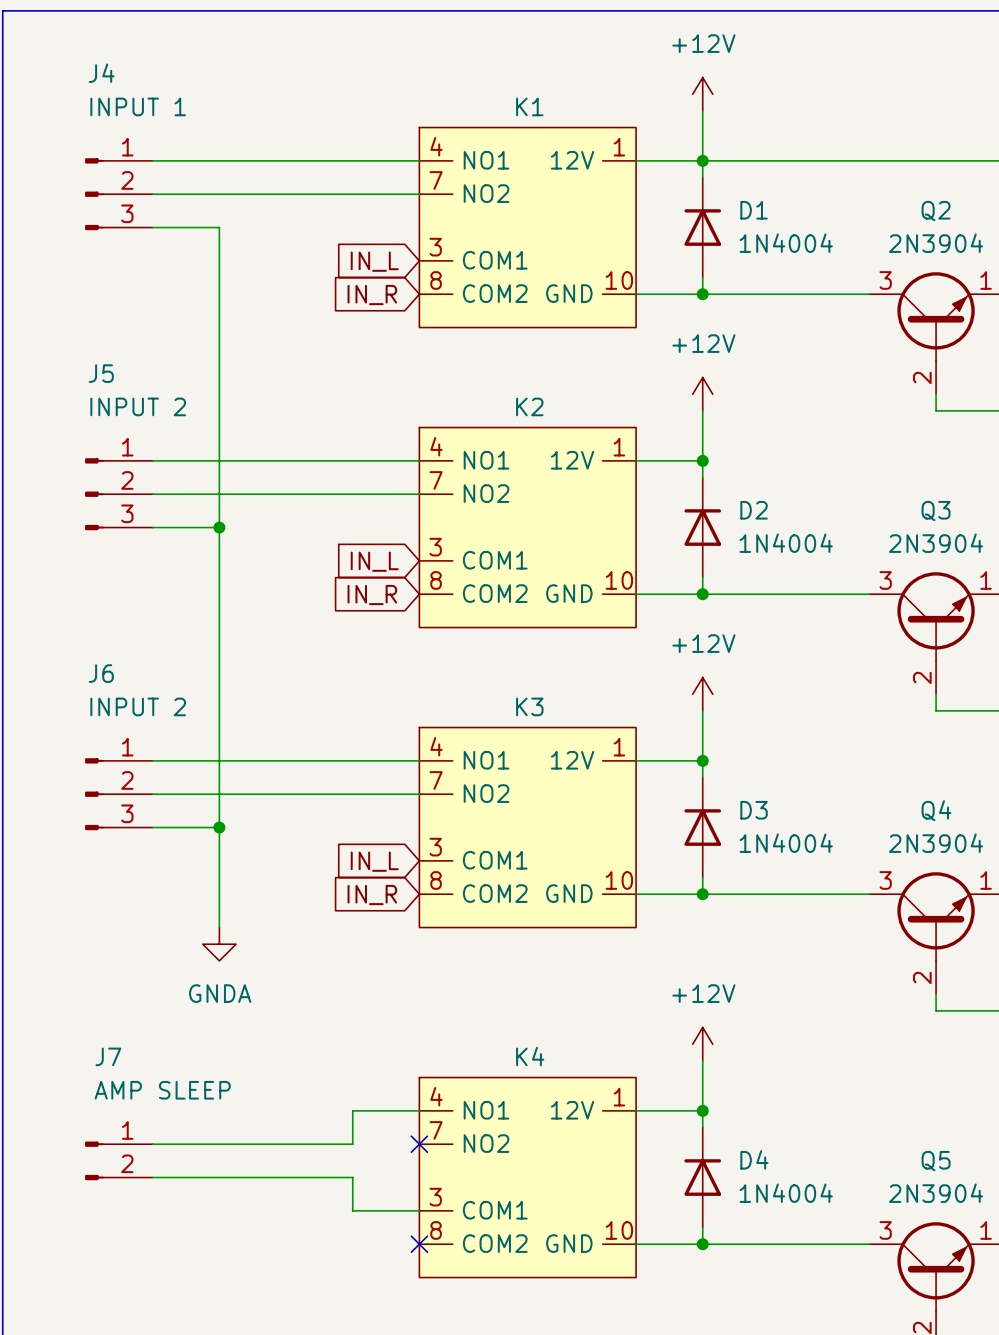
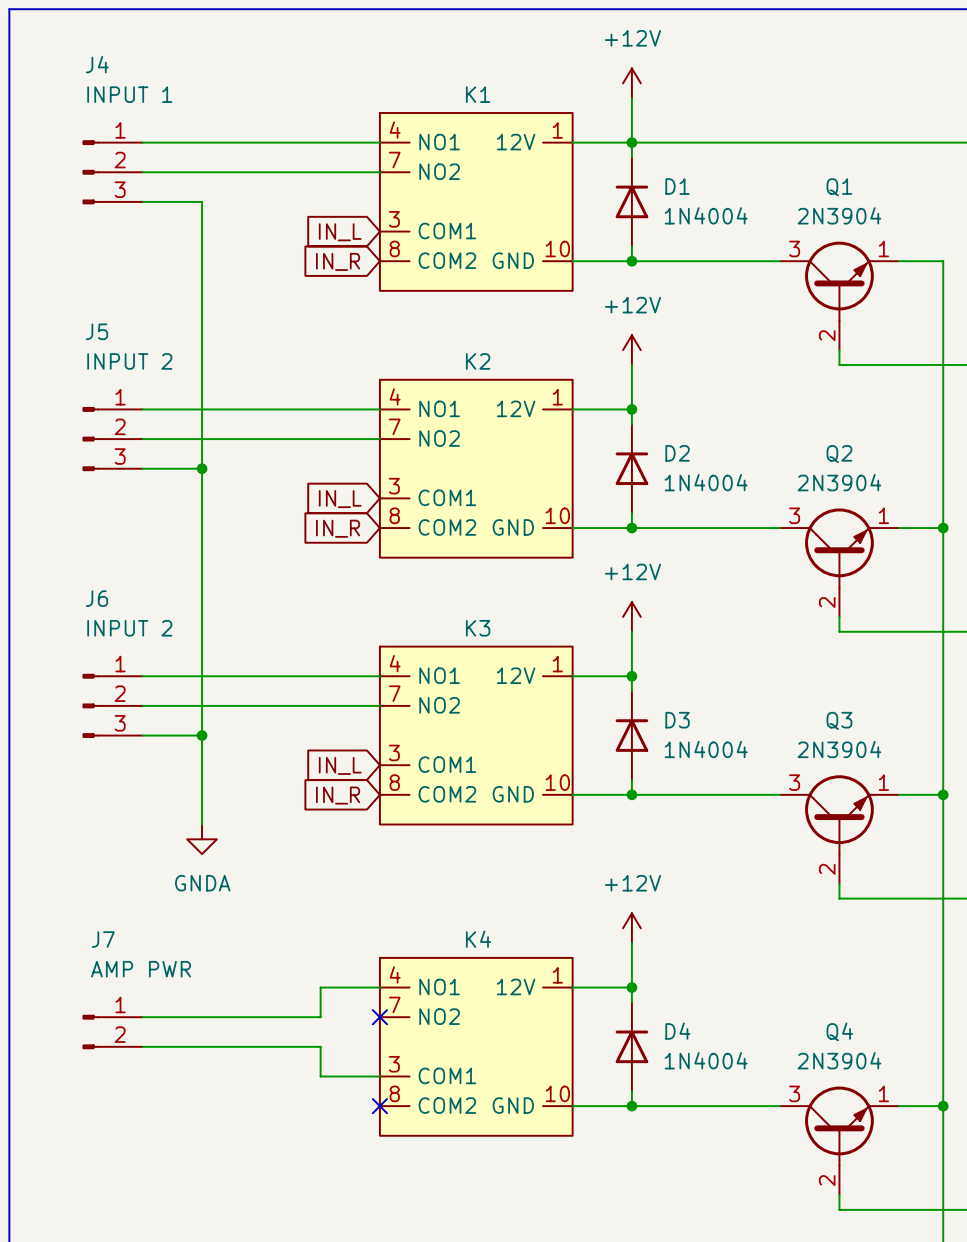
Q2 name: Q2 (936, 211) -> Q1 (839, 187)
Q3 name: Q3 (936, 511) -> Q2 (839, 454)
Q4 name: Q4 (936, 810) -> Q3 (839, 720)
J7 value: AMP SLEEP (162, 1090) -> AMP PWR (141, 969)
Q5 name: Q5 (936, 1161) -> Q4 (839, 1031)

